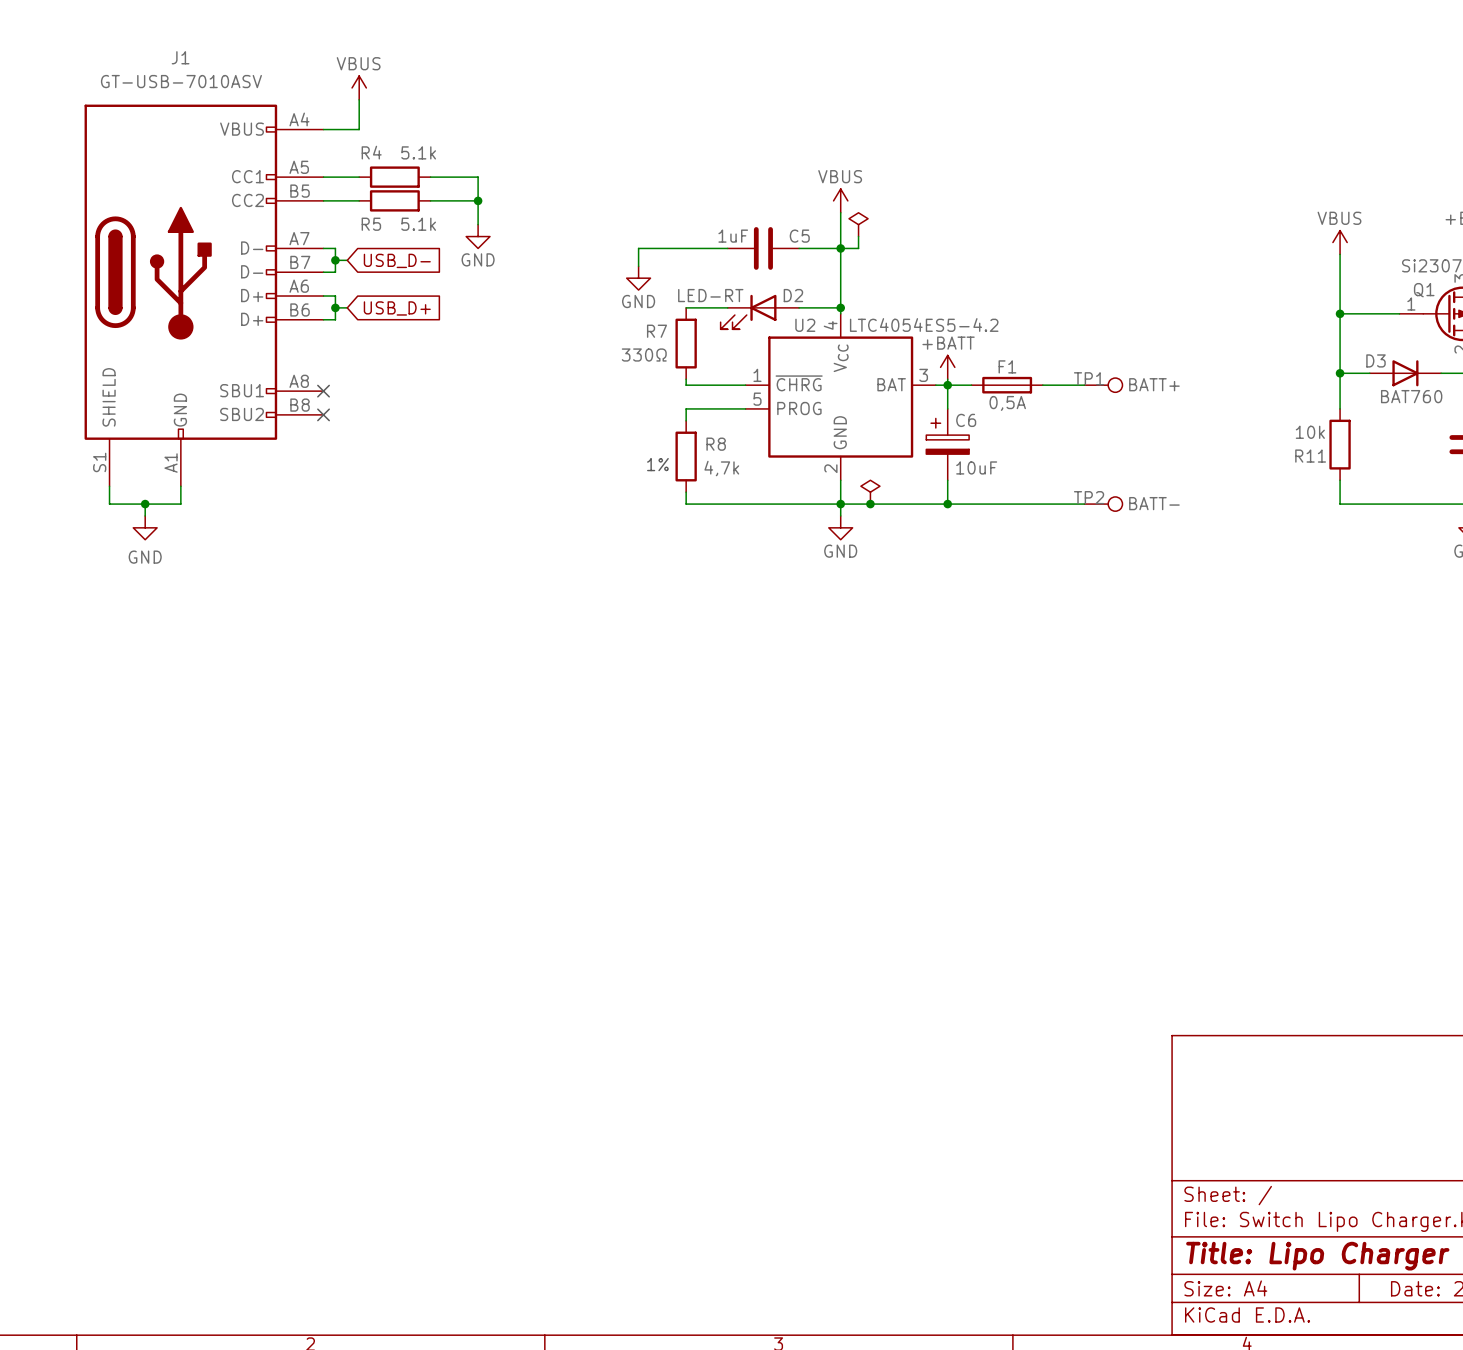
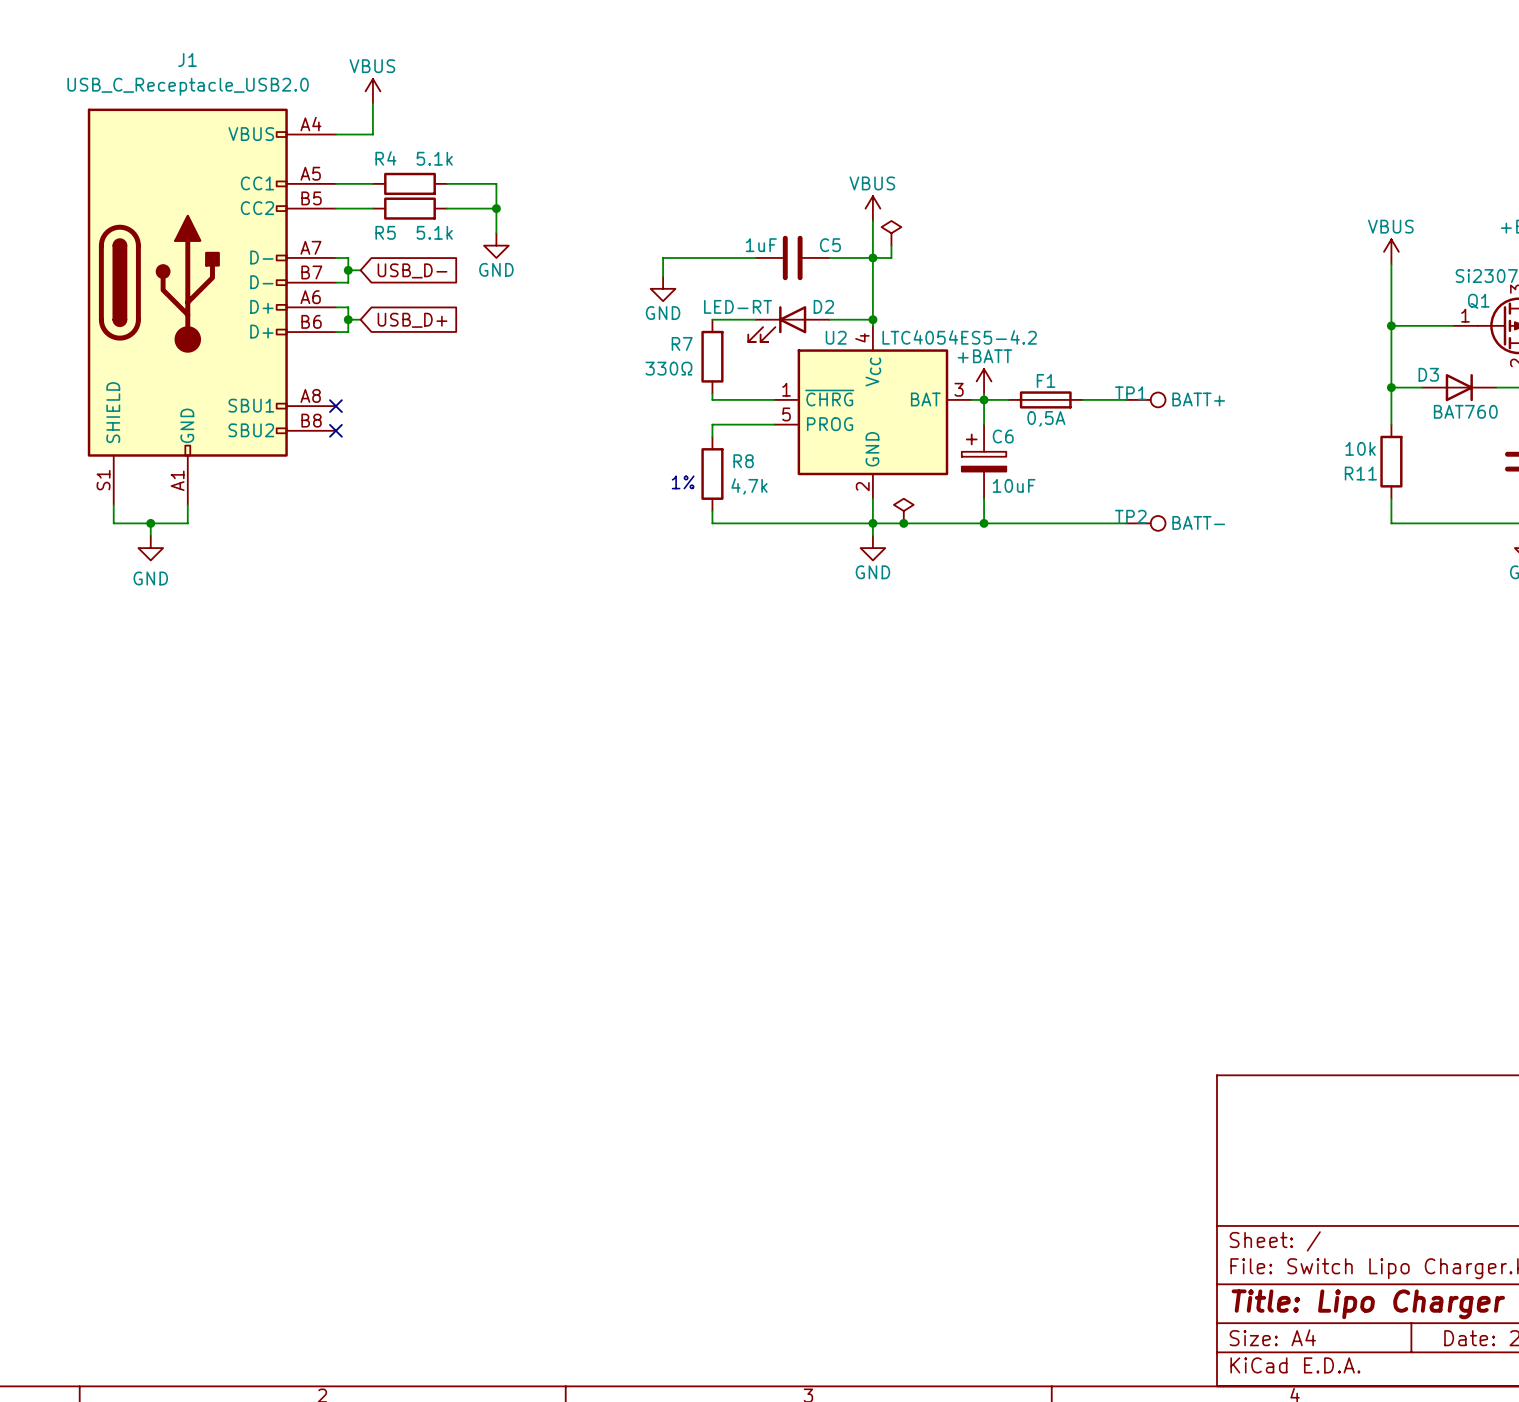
J1 value: GT-USB-7010ASV (181, 81) -> USB_C_Receptacle_USB2.0 (188, 86)

